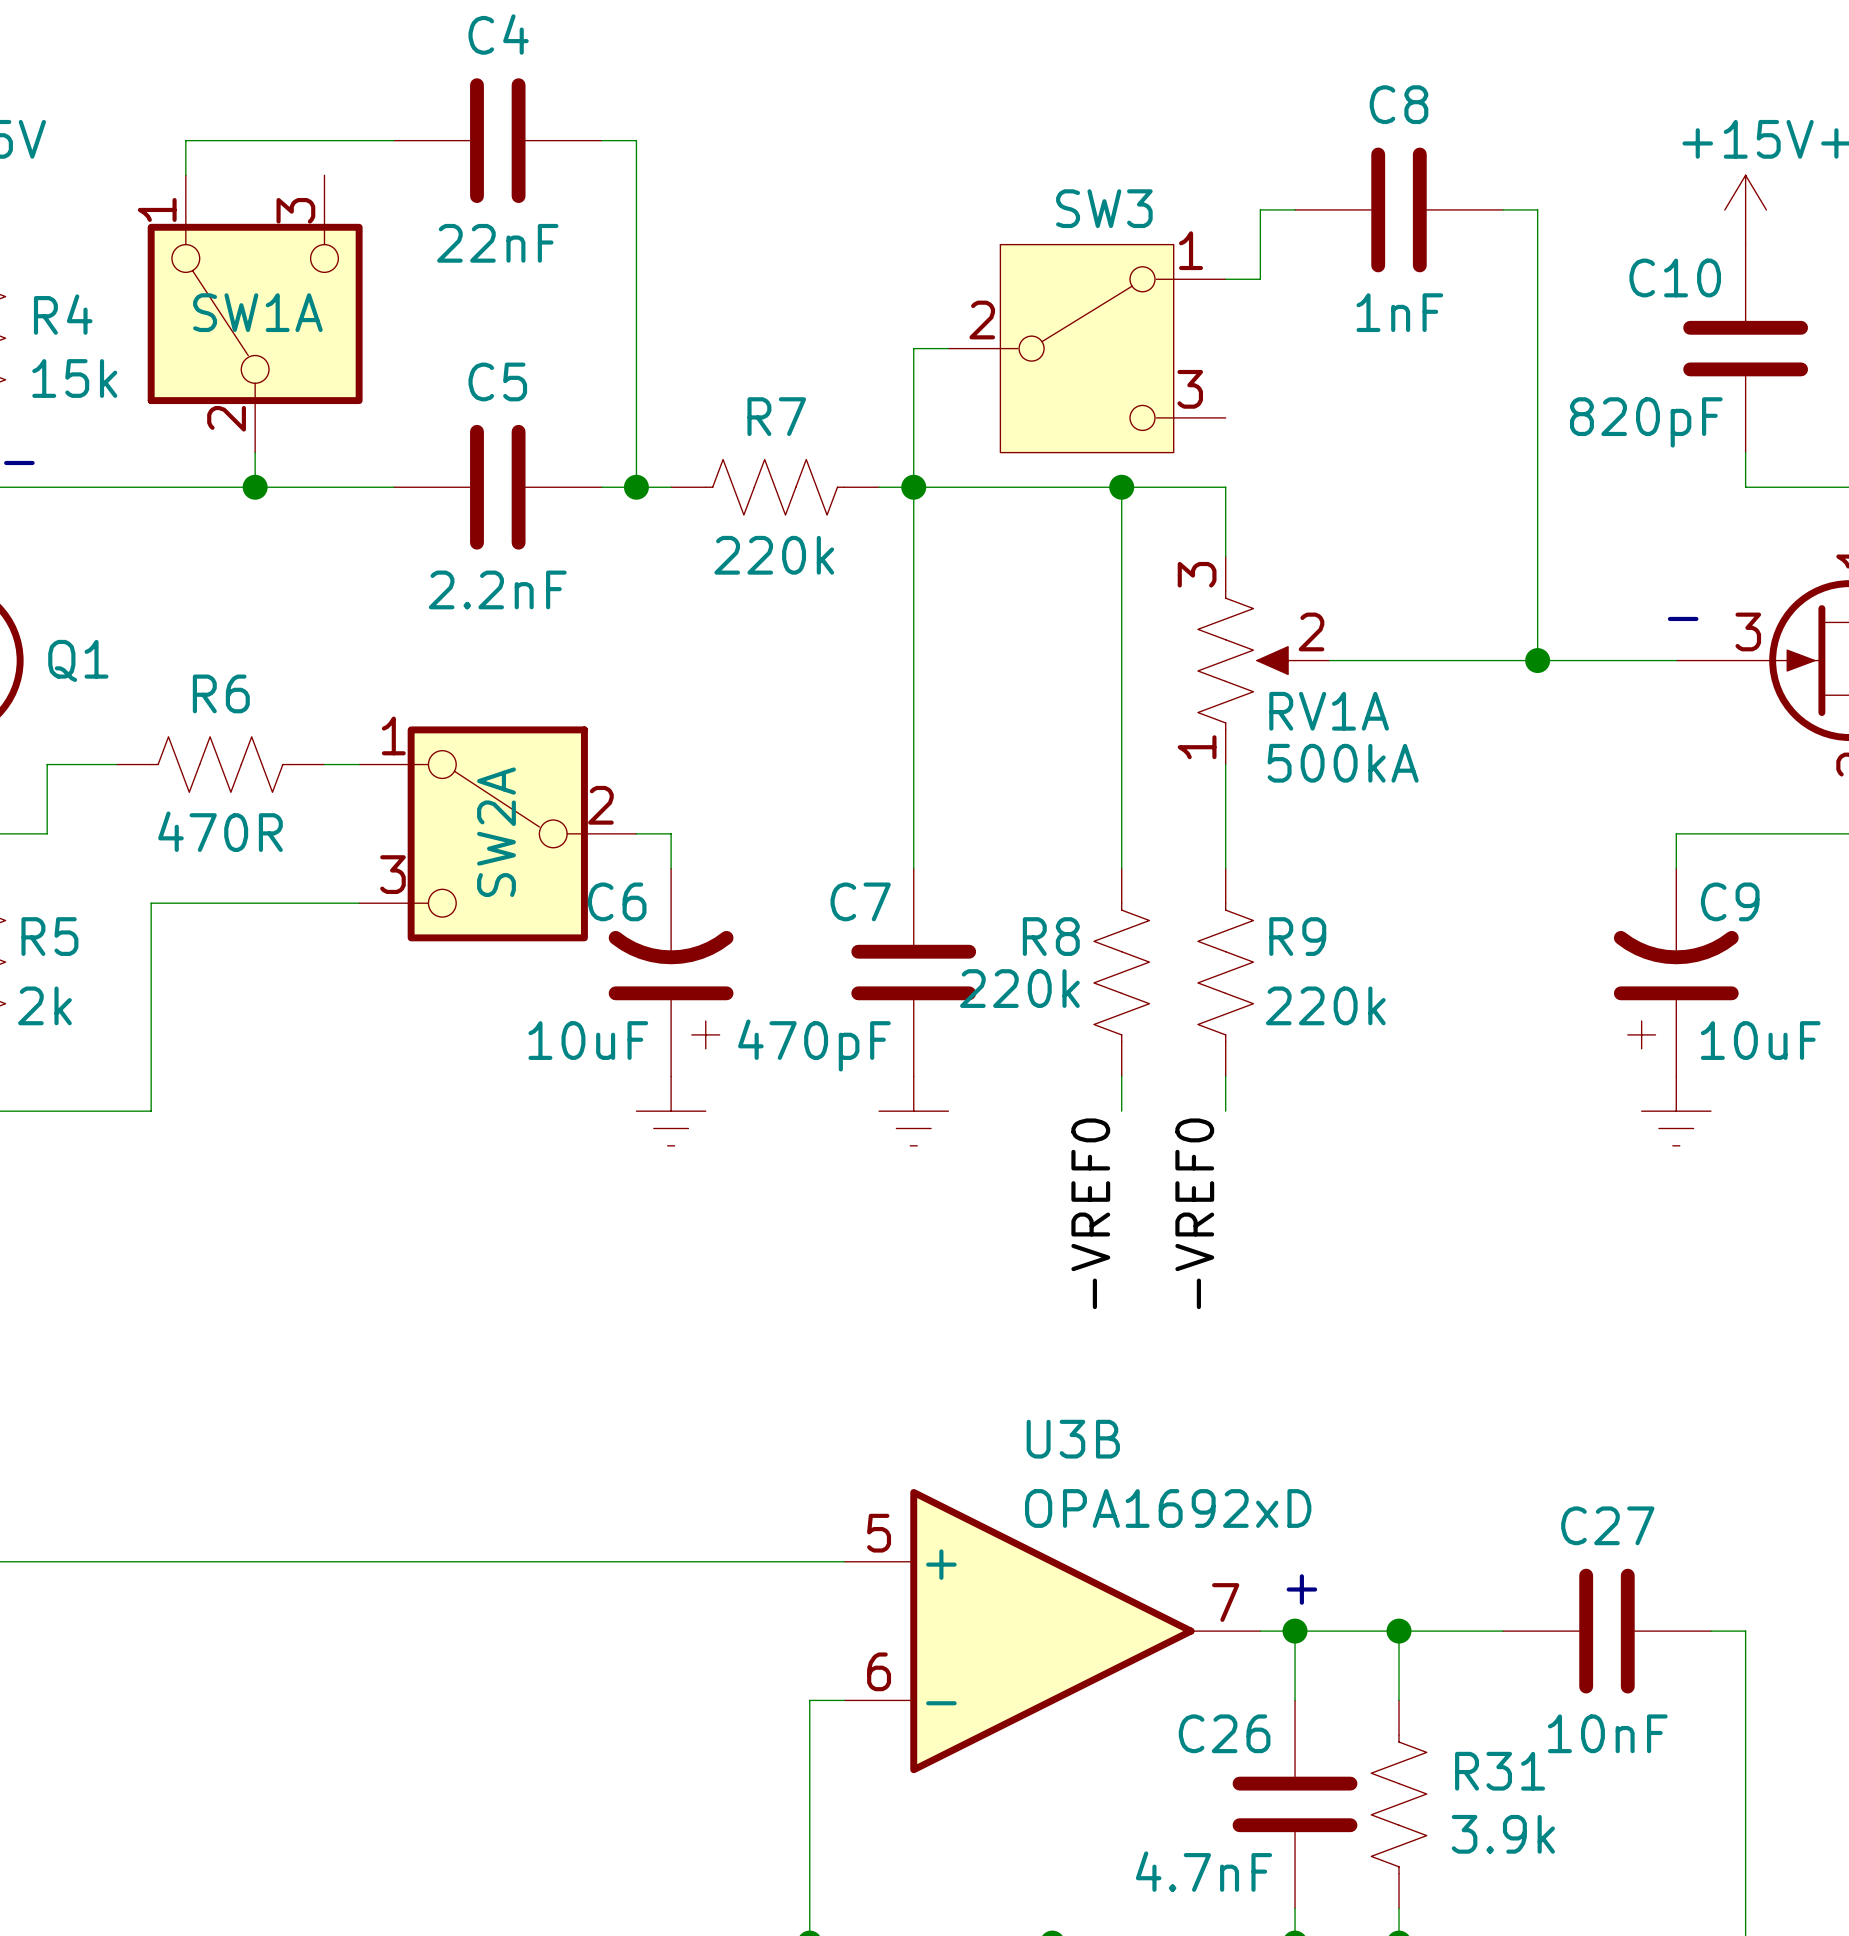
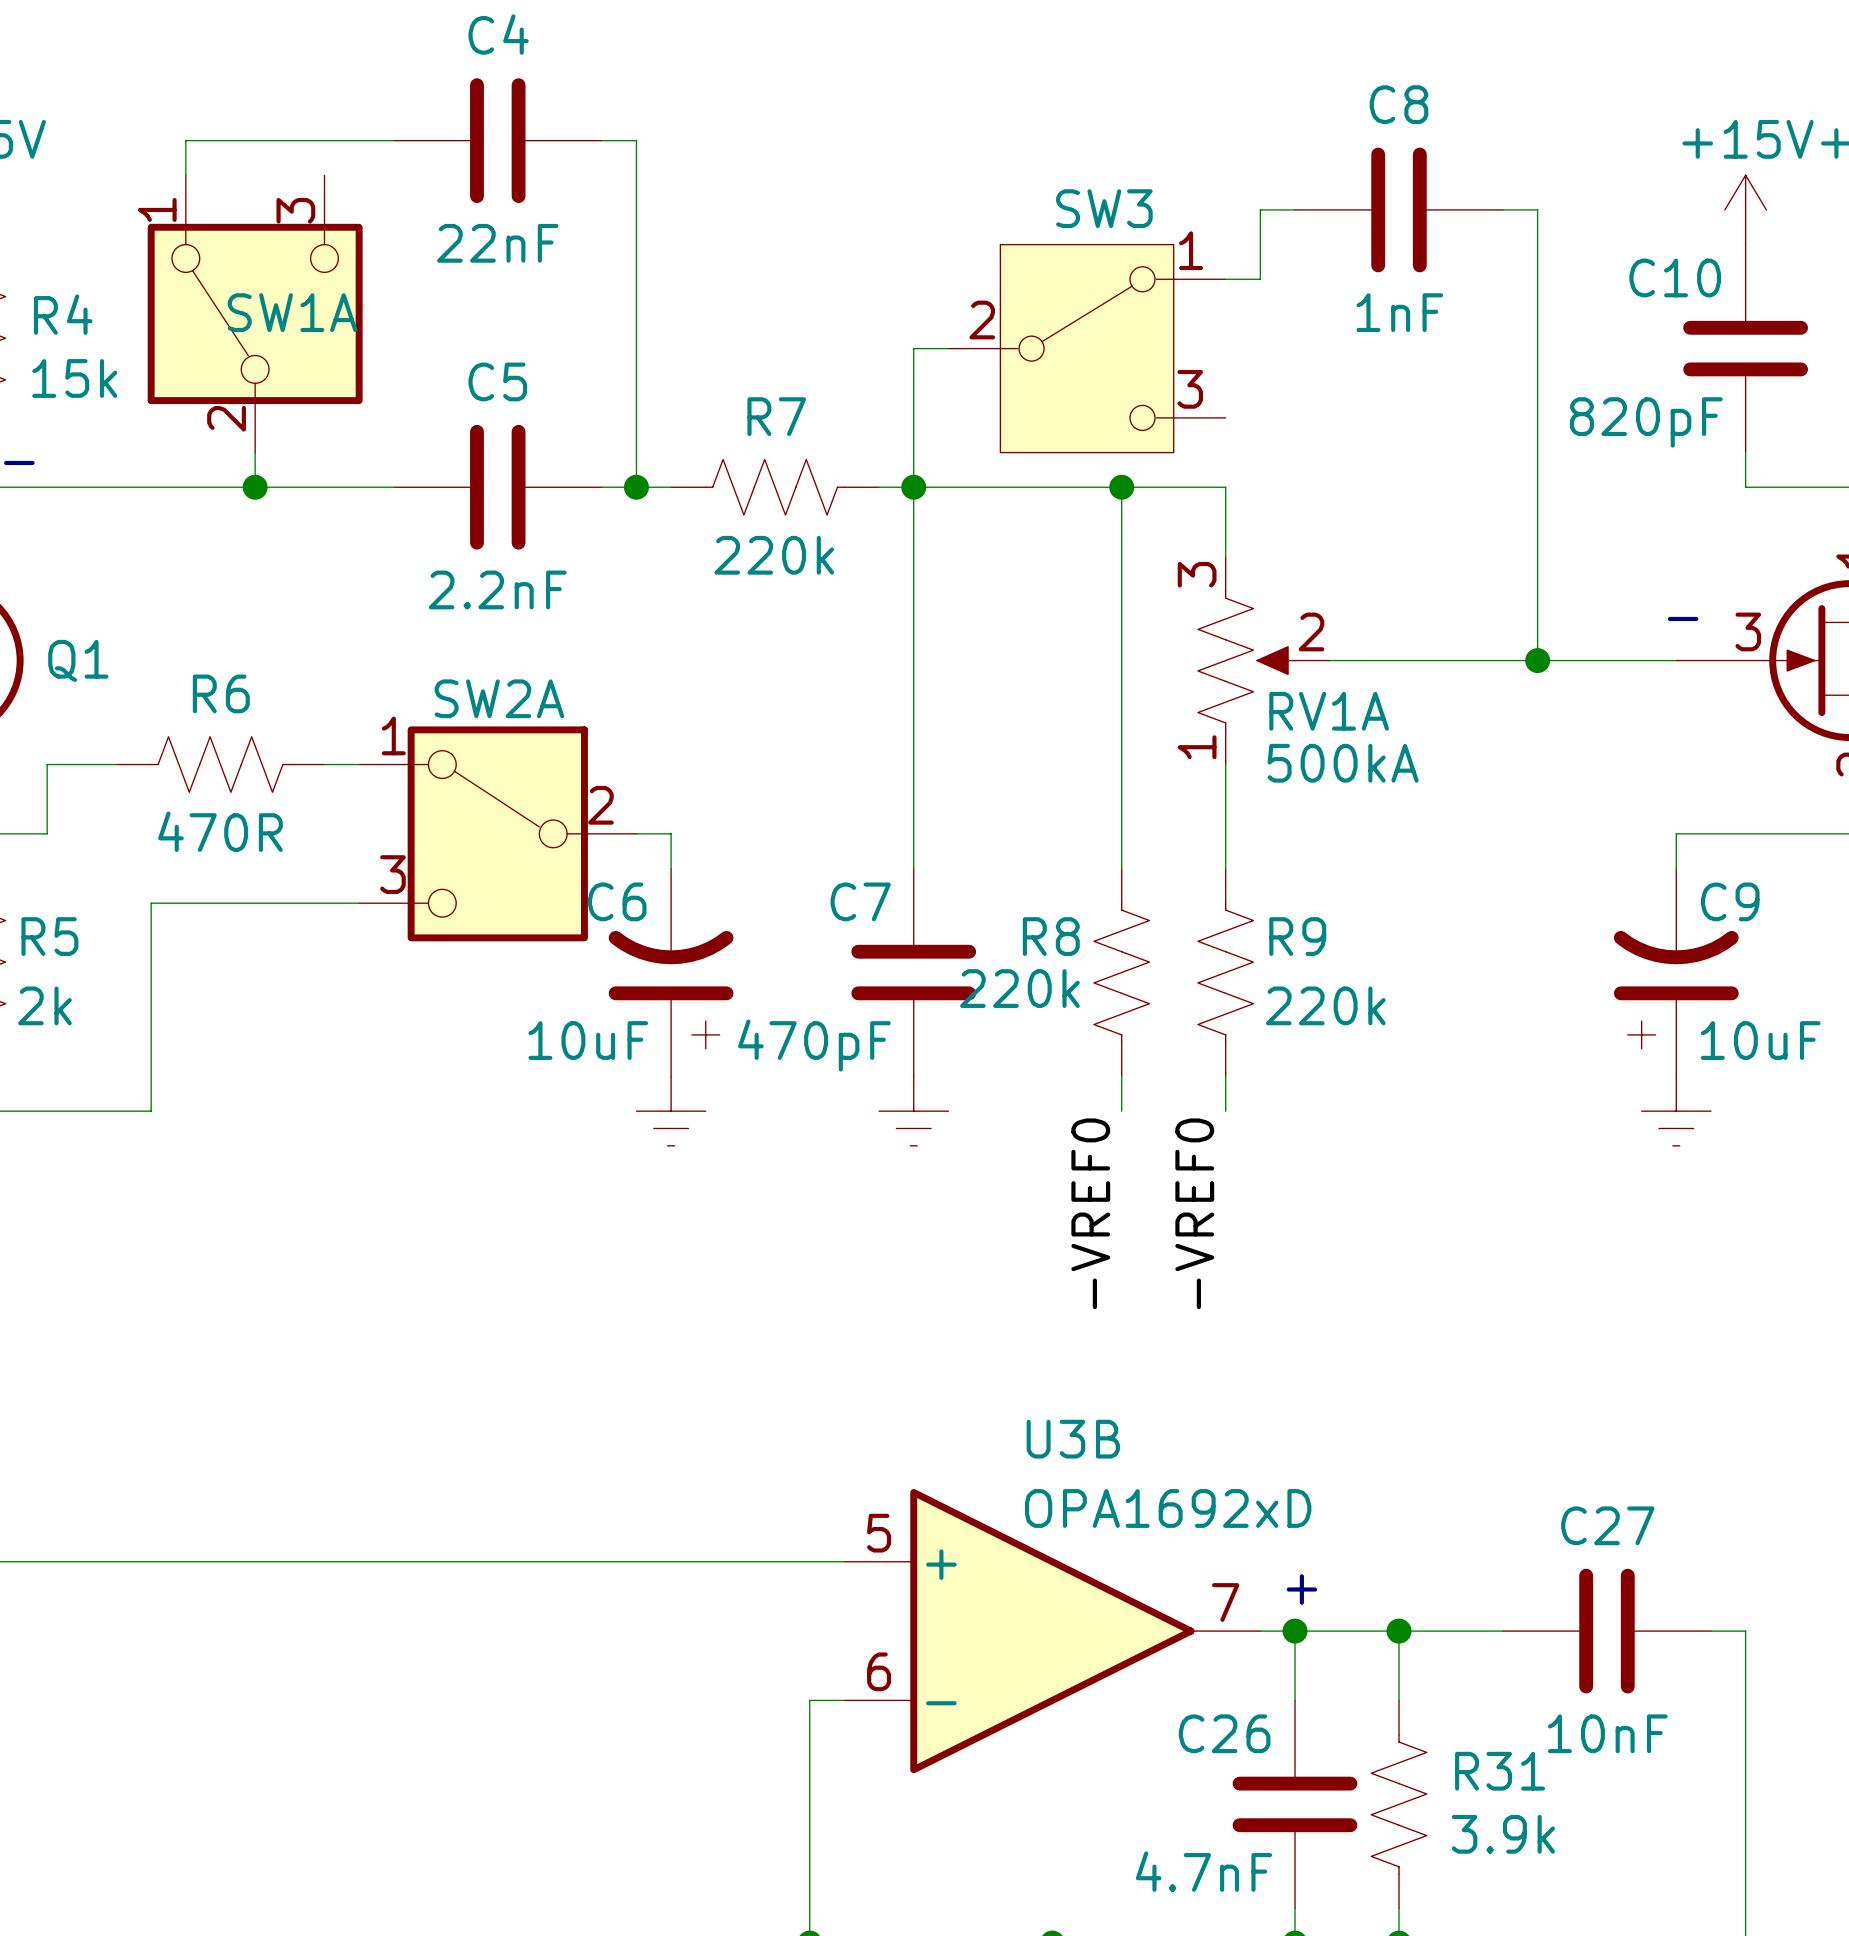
SW1A name position: SW1A (257, 312) -> SW1A (292, 312)
SW2A name rotation: 0° (496, 832) -> 90° clockwise (499, 698)

